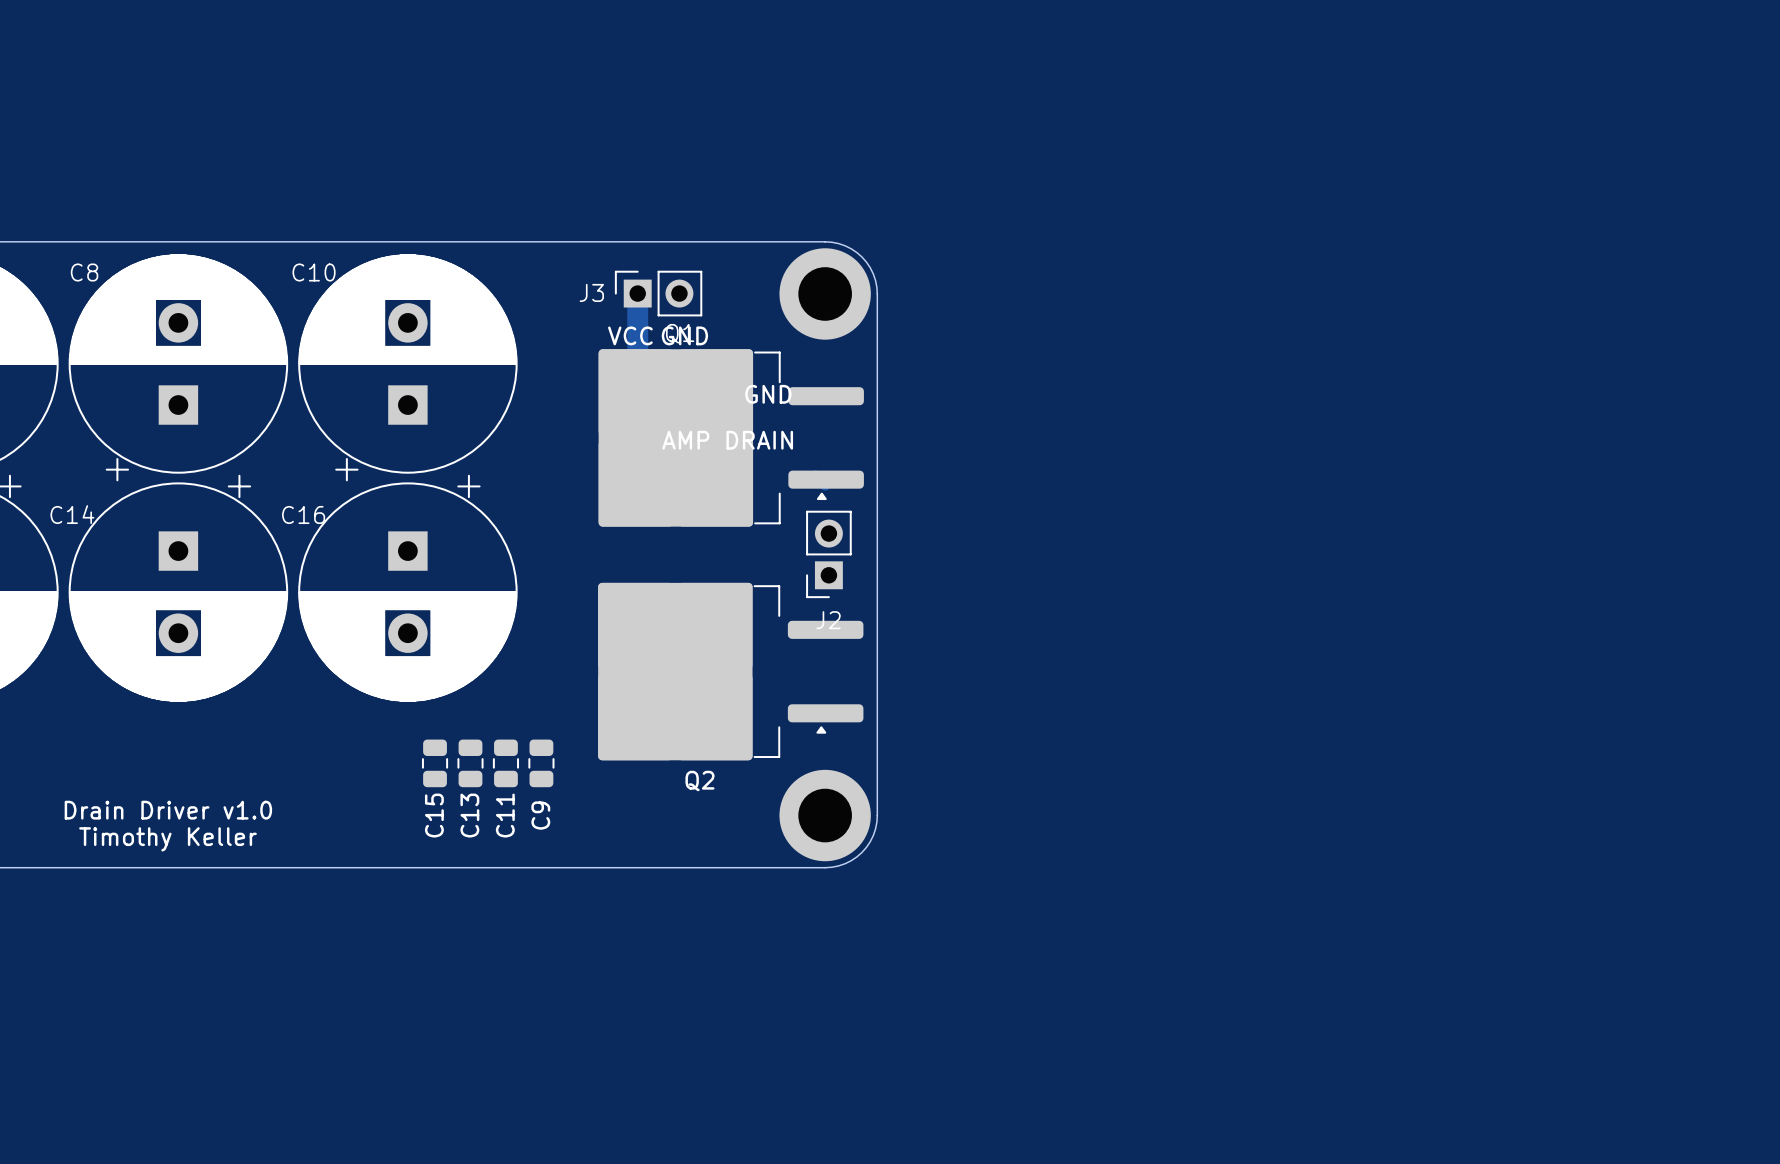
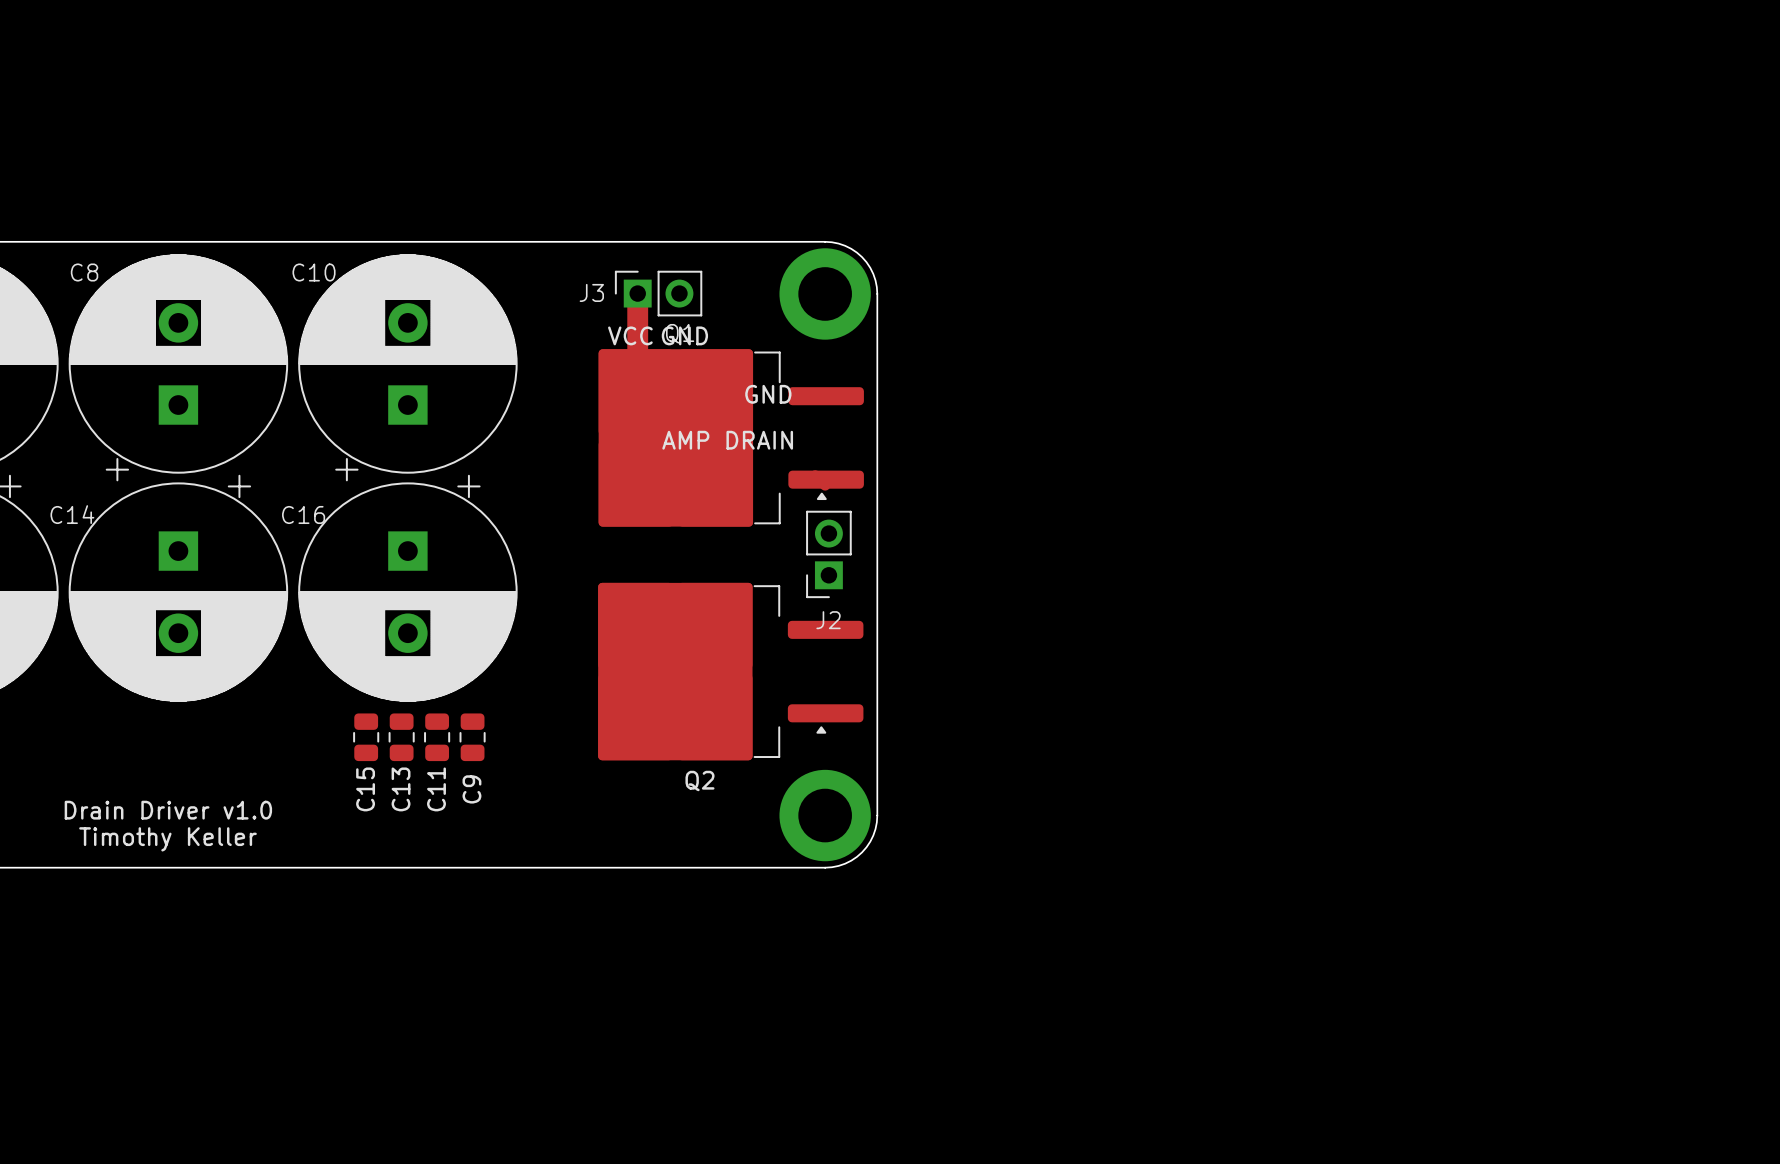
C15 position: (435, 763) -> (366, 737)
C13 position: (470, 763) -> (401, 737)
C11 position: (505, 763) -> (437, 737)
C9 position: (541, 763) -> (472, 737)

